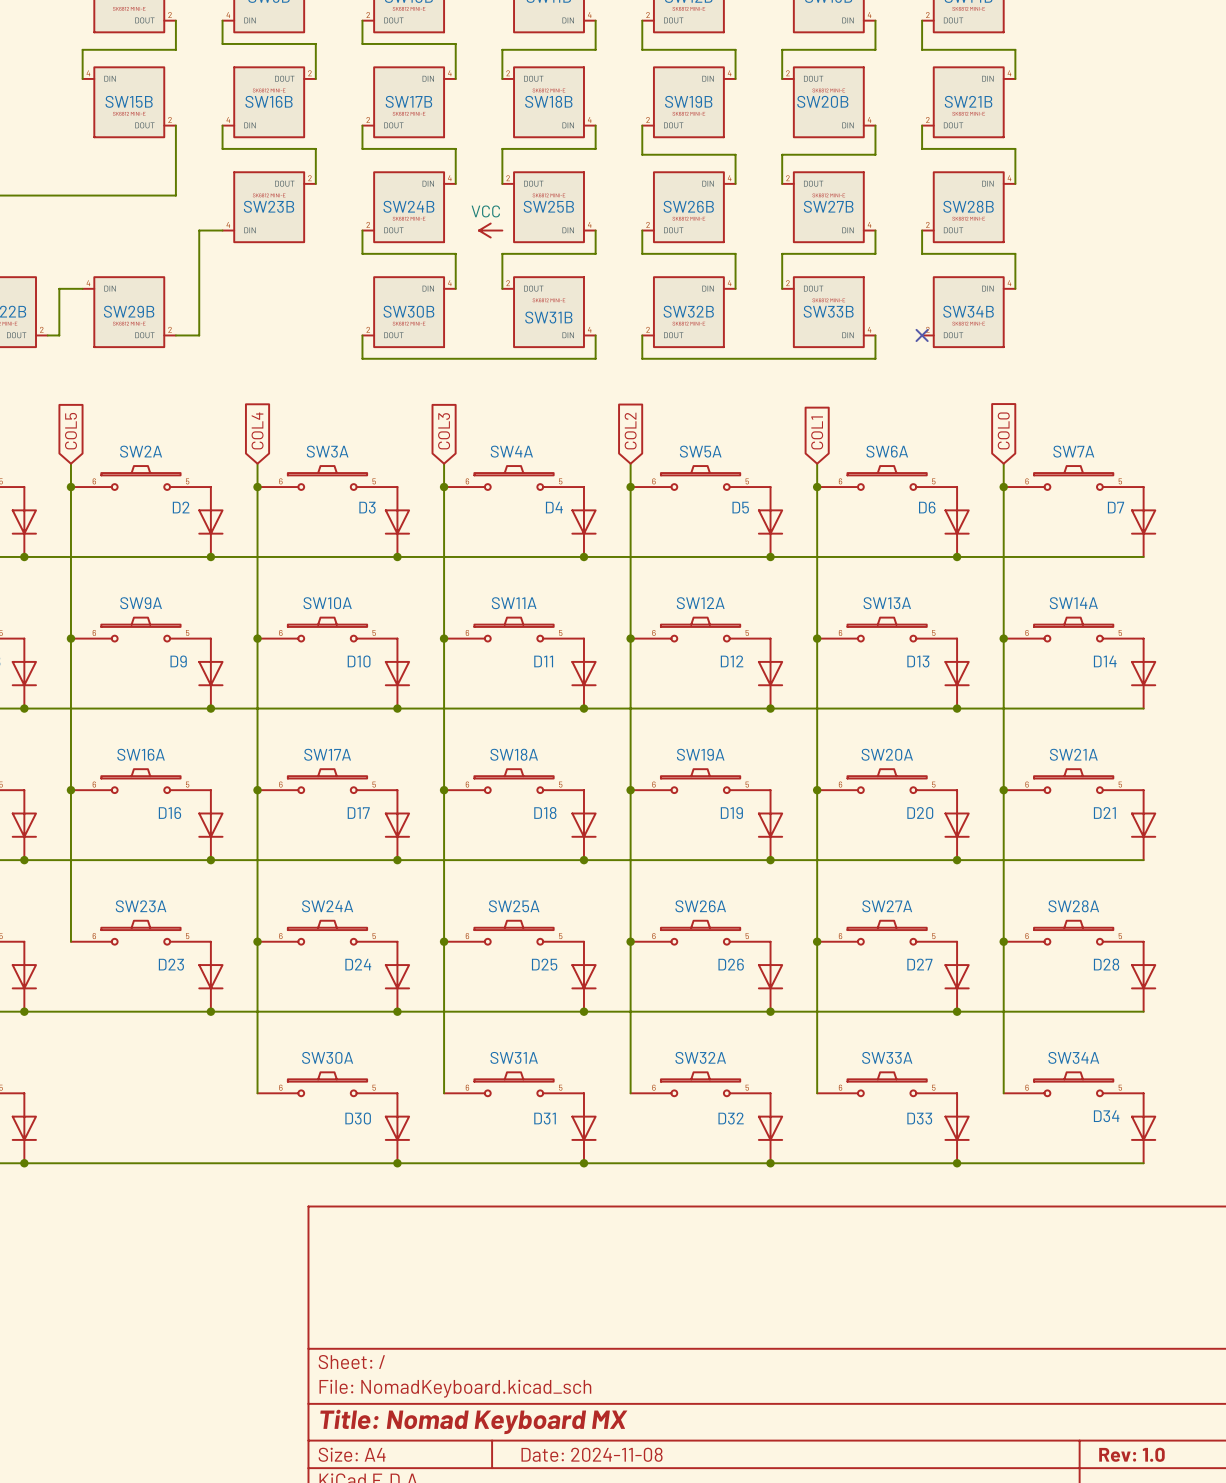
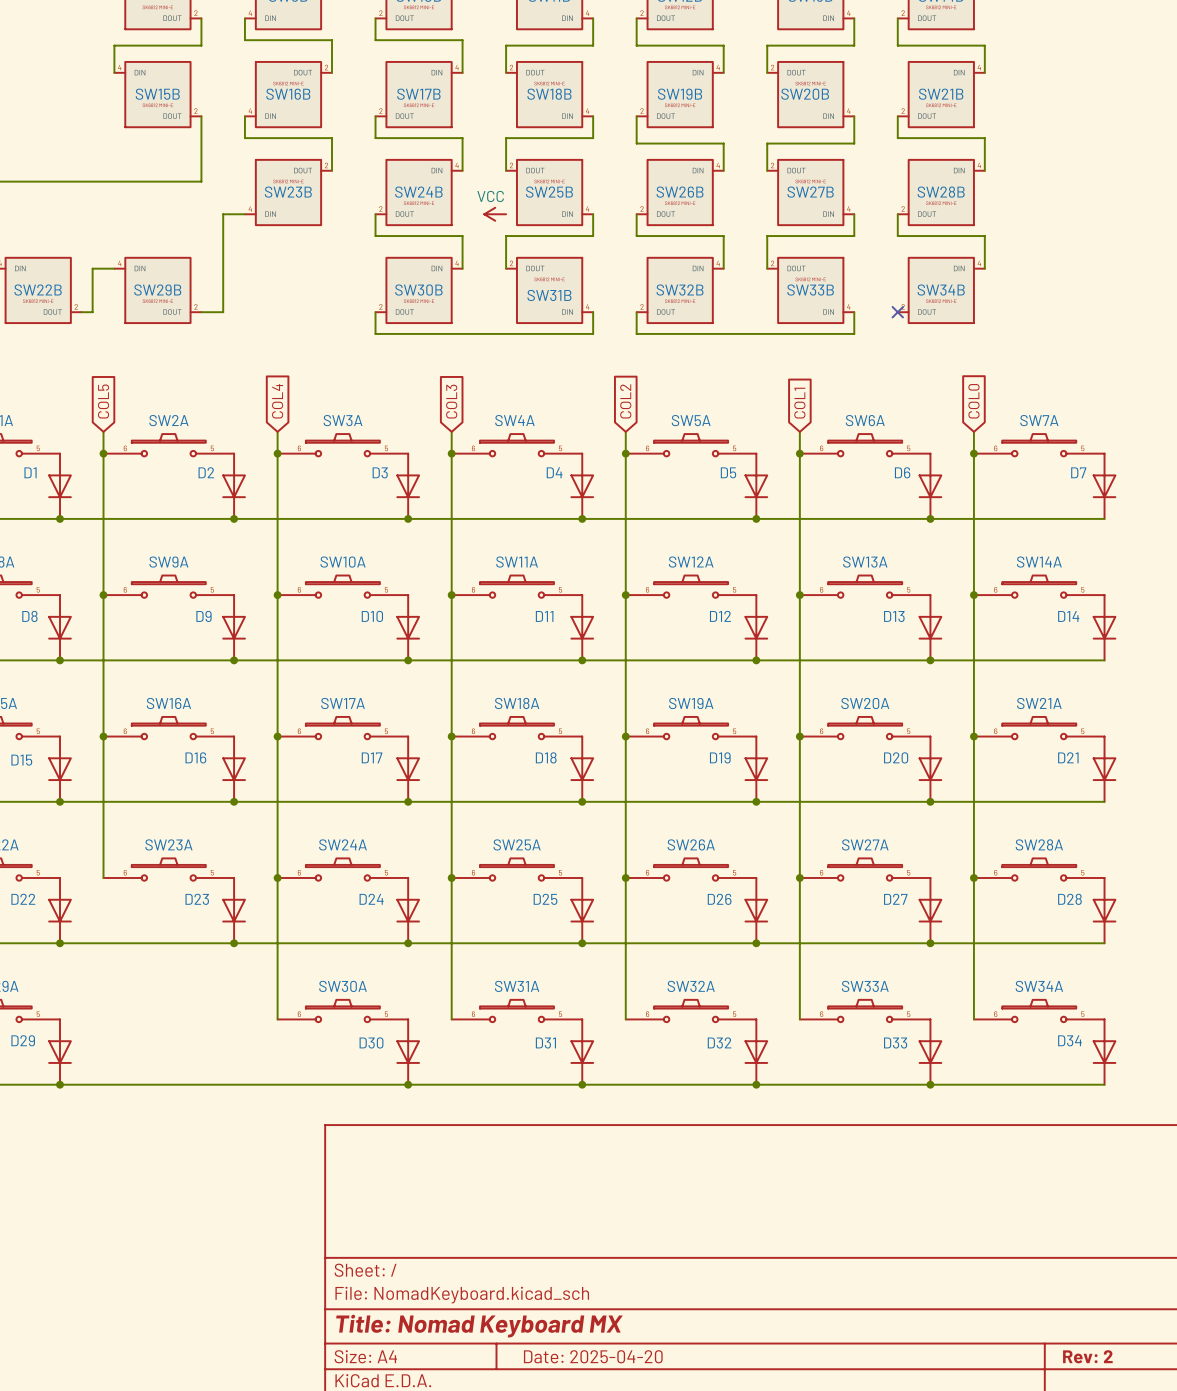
title block: Date: 2024-11-08 (592, 1454) -> Date: 2025-04-20 (593, 1356)
title block: Rev: 1.0 (1131, 1454) -> Rev: 2 (1087, 1356)

